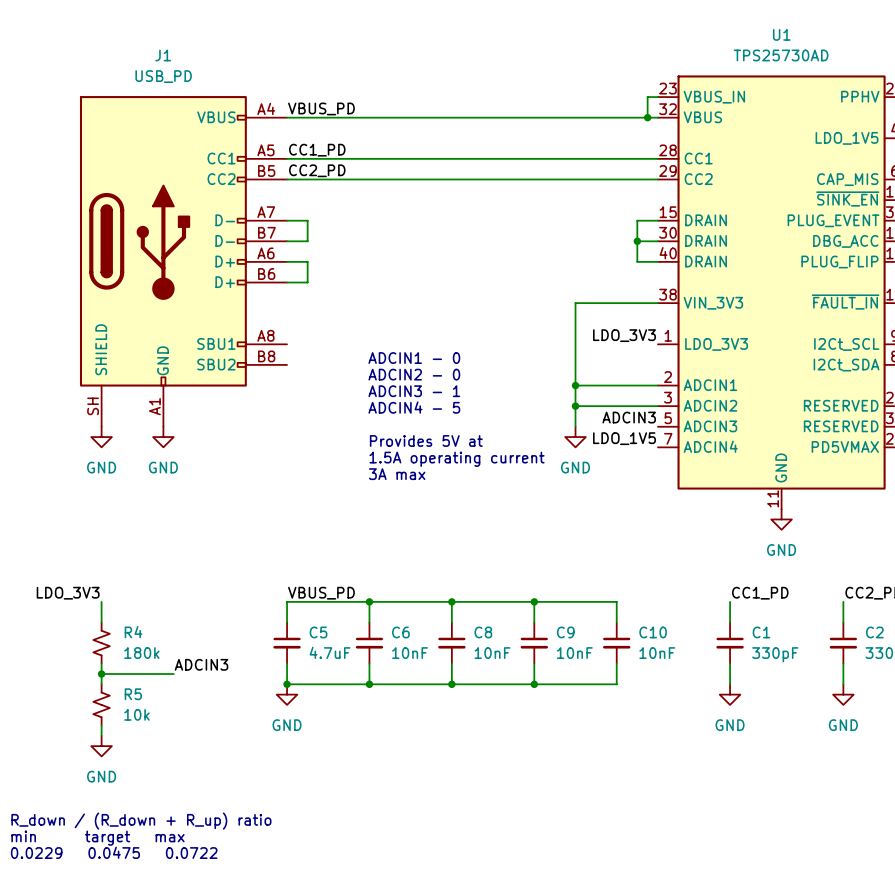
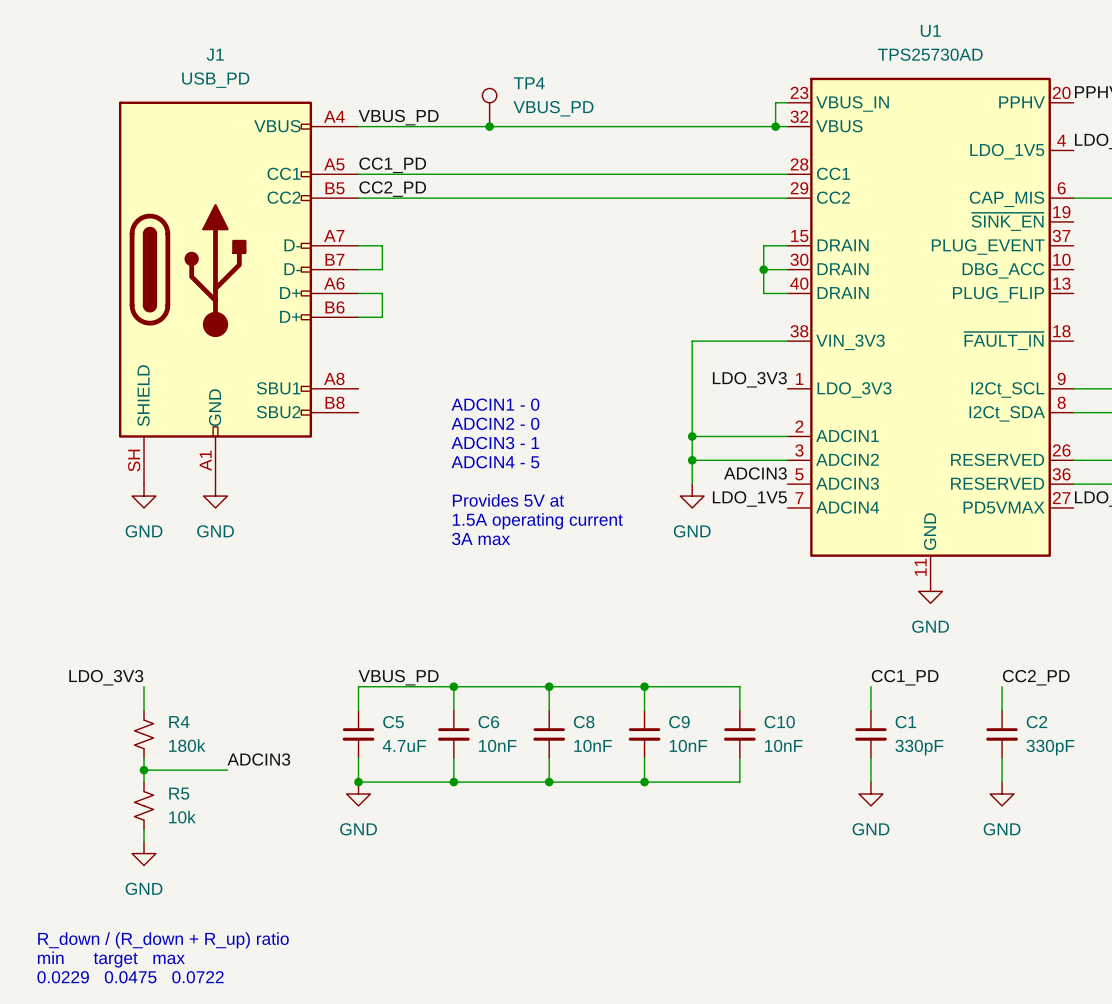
TP4: none -> VBUS_PD (489, 107)
junction: none -> (489, 126)

